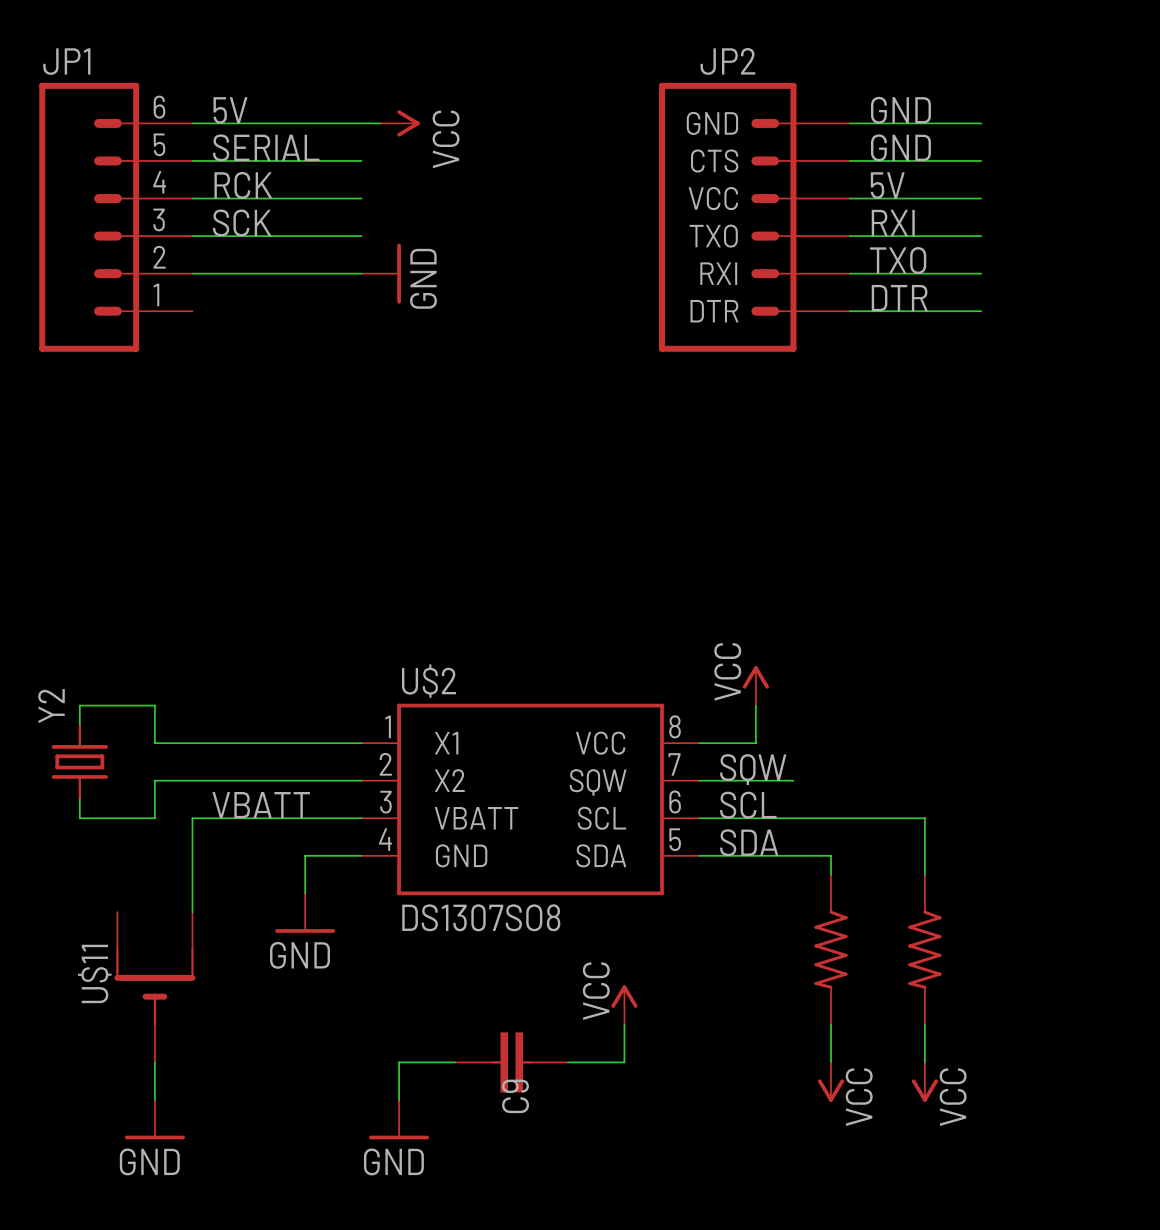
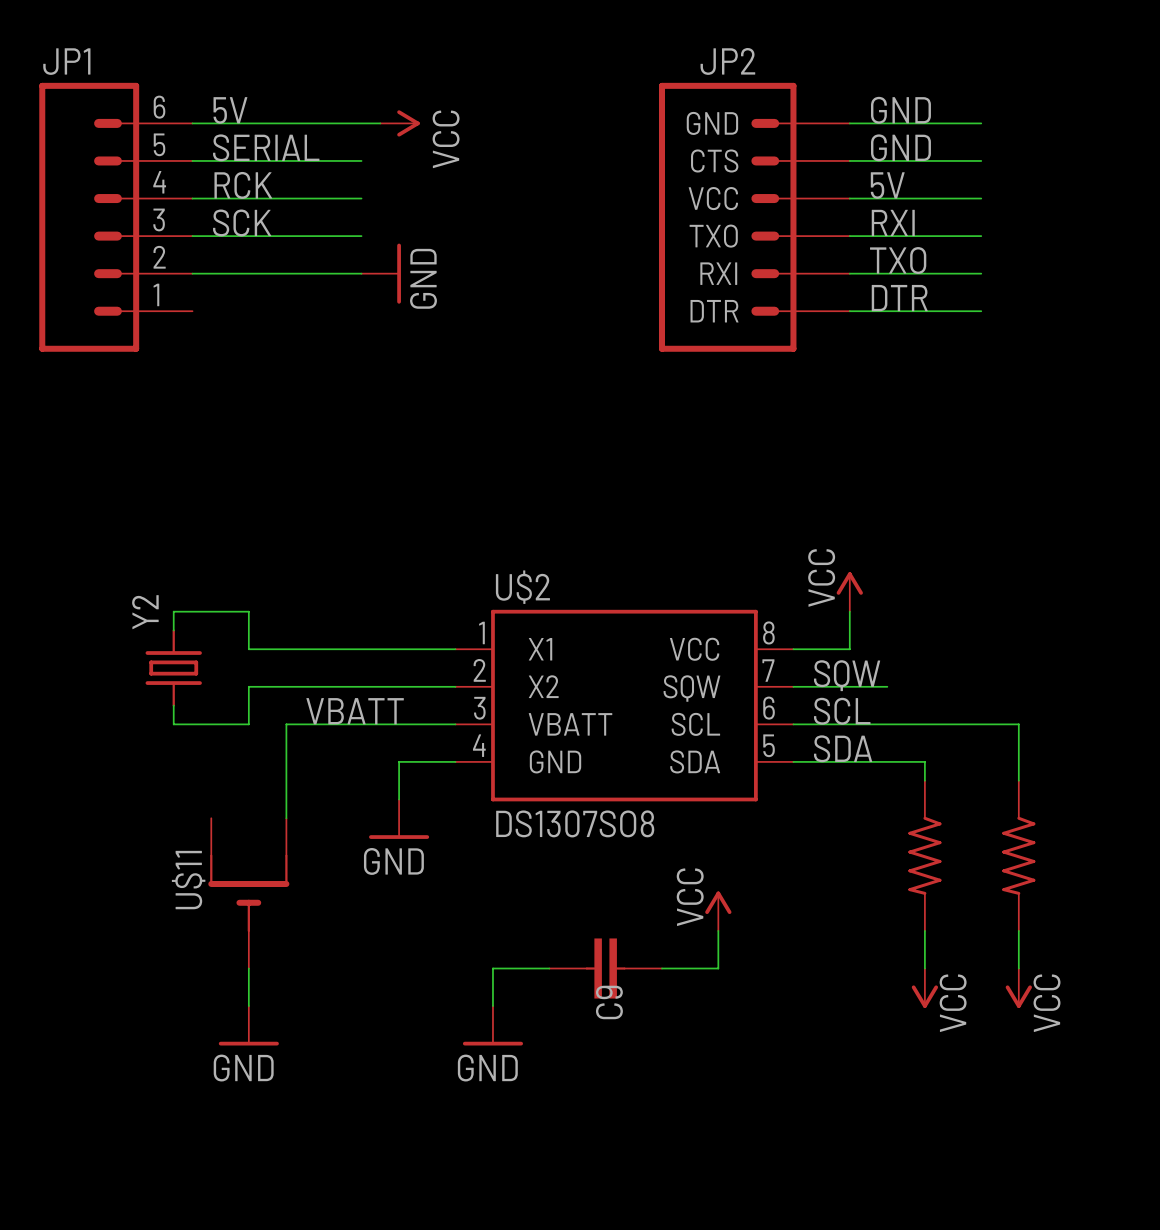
power symbol: none -> VCC (849, 591)
power symbol: VCC (755, 685) -> none
wire: (755, 705) (755, 743) (699, 743) -> (849, 611) (849, 649) (793, 649)
wire: (79, 724) (79, 705) (154, 705) (154, 743) (361, 743) -> (173, 630) (173, 611) (248, 611) (248, 649) (455, 649)
Y2 position: (79, 761) -> (173, 668)
label position: SQW (753, 769) -> SQW (847, 675)
wire: (361, 780) (154, 780) (154, 818) (79, 818) (79, 799) -> (455, 686) (248, 686) (248, 724) (173, 724) (173, 705)
wire: (699, 780) (793, 780) -> (793, 686) (887, 686)
U$2 position: (530, 799) -> (624, 705)
label position: VBATT (261, 805) -> VBATT (355, 711)
label position: SCL (748, 805) -> SCL (842, 711)
wire: (361, 818) (192, 818) (192, 912) -> (455, 724) (286, 724) (286, 818)
wire: (699, 818) (924, 818) (924, 874) -> (793, 724) (1018, 724) (1018, 780)
power symbol: none -> GND (399, 819)
label position: SDA (749, 842) -> SDA (843, 748)
wire: (361, 855) (305, 855) (305, 893) -> (455, 761) (399, 761) (399, 799)
wire: (699, 855) (831, 855) (831, 874) -> (793, 761) (924, 761) (924, 780)
part: none -> (924, 855)
part: none -> (1018, 855)
power symbol: none -> VCC (718, 911)
power symbol: GND (305, 913) -> none
part: (831, 949) -> none
part: (924, 949) -> none
U$11 position: (154, 987) -> (248, 893)
power symbol: none -> VCC (924, 988)
power symbol: none -> VCC (1018, 988)
power symbol: VCC (624, 1005) -> none
wire: (624, 1024) (624, 1062) (568, 1062) -> (718, 930) (718, 968) (661, 968)
wire: (831, 1024) (831, 1062) -> (924, 930) (924, 968)
wire: (924, 1024) (924, 1062) -> (1018, 930) (1018, 968)
power symbol: none -> GND (248, 1025)
power symbol: none -> GND (492, 1025)
wire: (154, 1062) (154, 1099) -> (248, 968) (248, 1006)
wire: (455, 1062) (399, 1062) (399, 1099) -> (549, 968) (492, 968) (492, 1006)
C9 position: (511, 1062) -> (605, 968)
power symbol: VCC (831, 1082) -> none
power symbol: VCC (924, 1082) -> none
power symbol: GND (154, 1119) -> none
power symbol: GND (399, 1119) -> none

